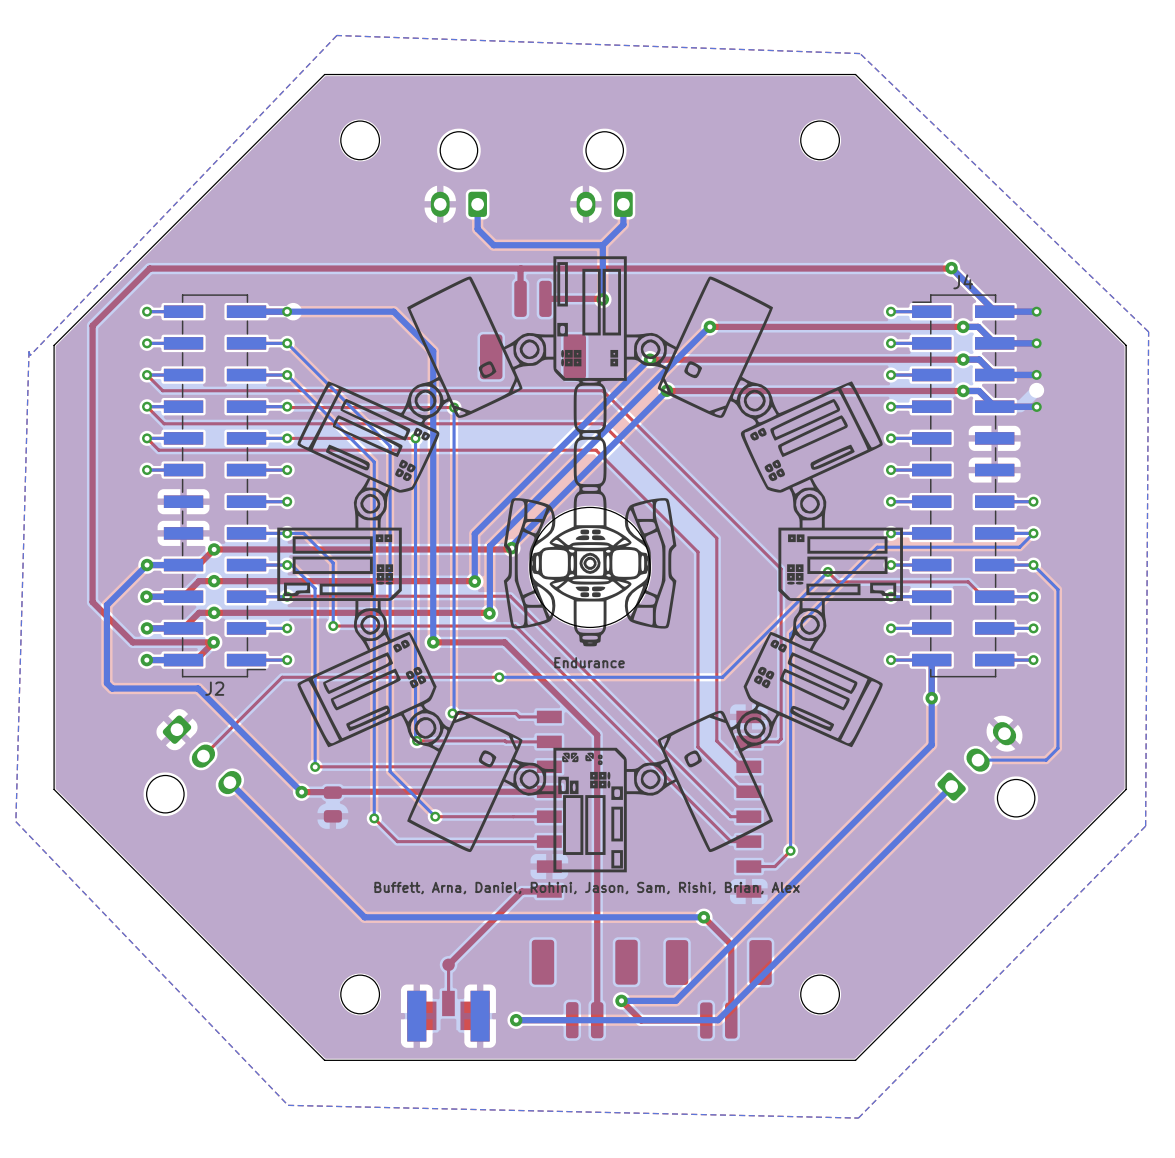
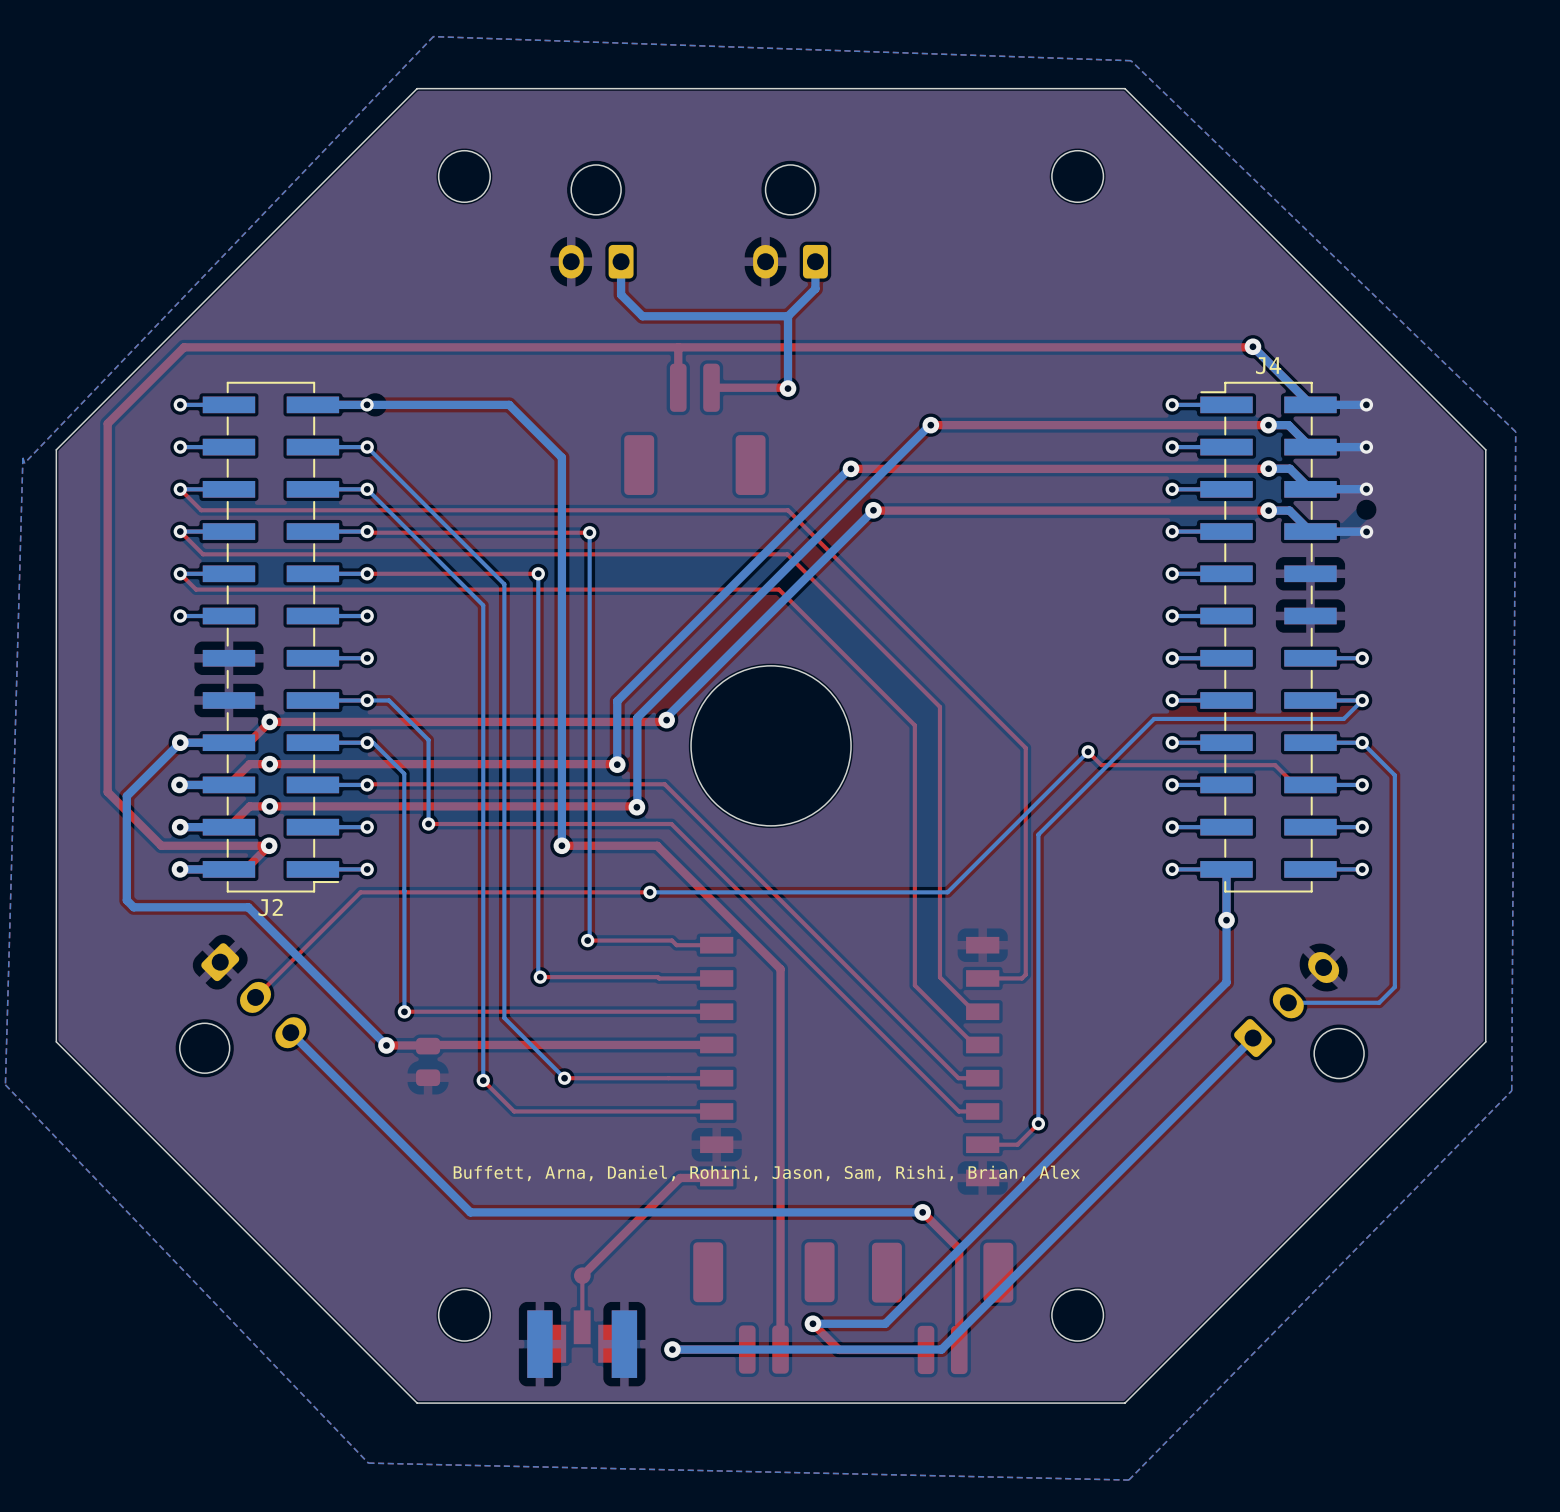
drawing: [277, 256, 903, 873] -> none
text: Endurance (589, 662) -> none

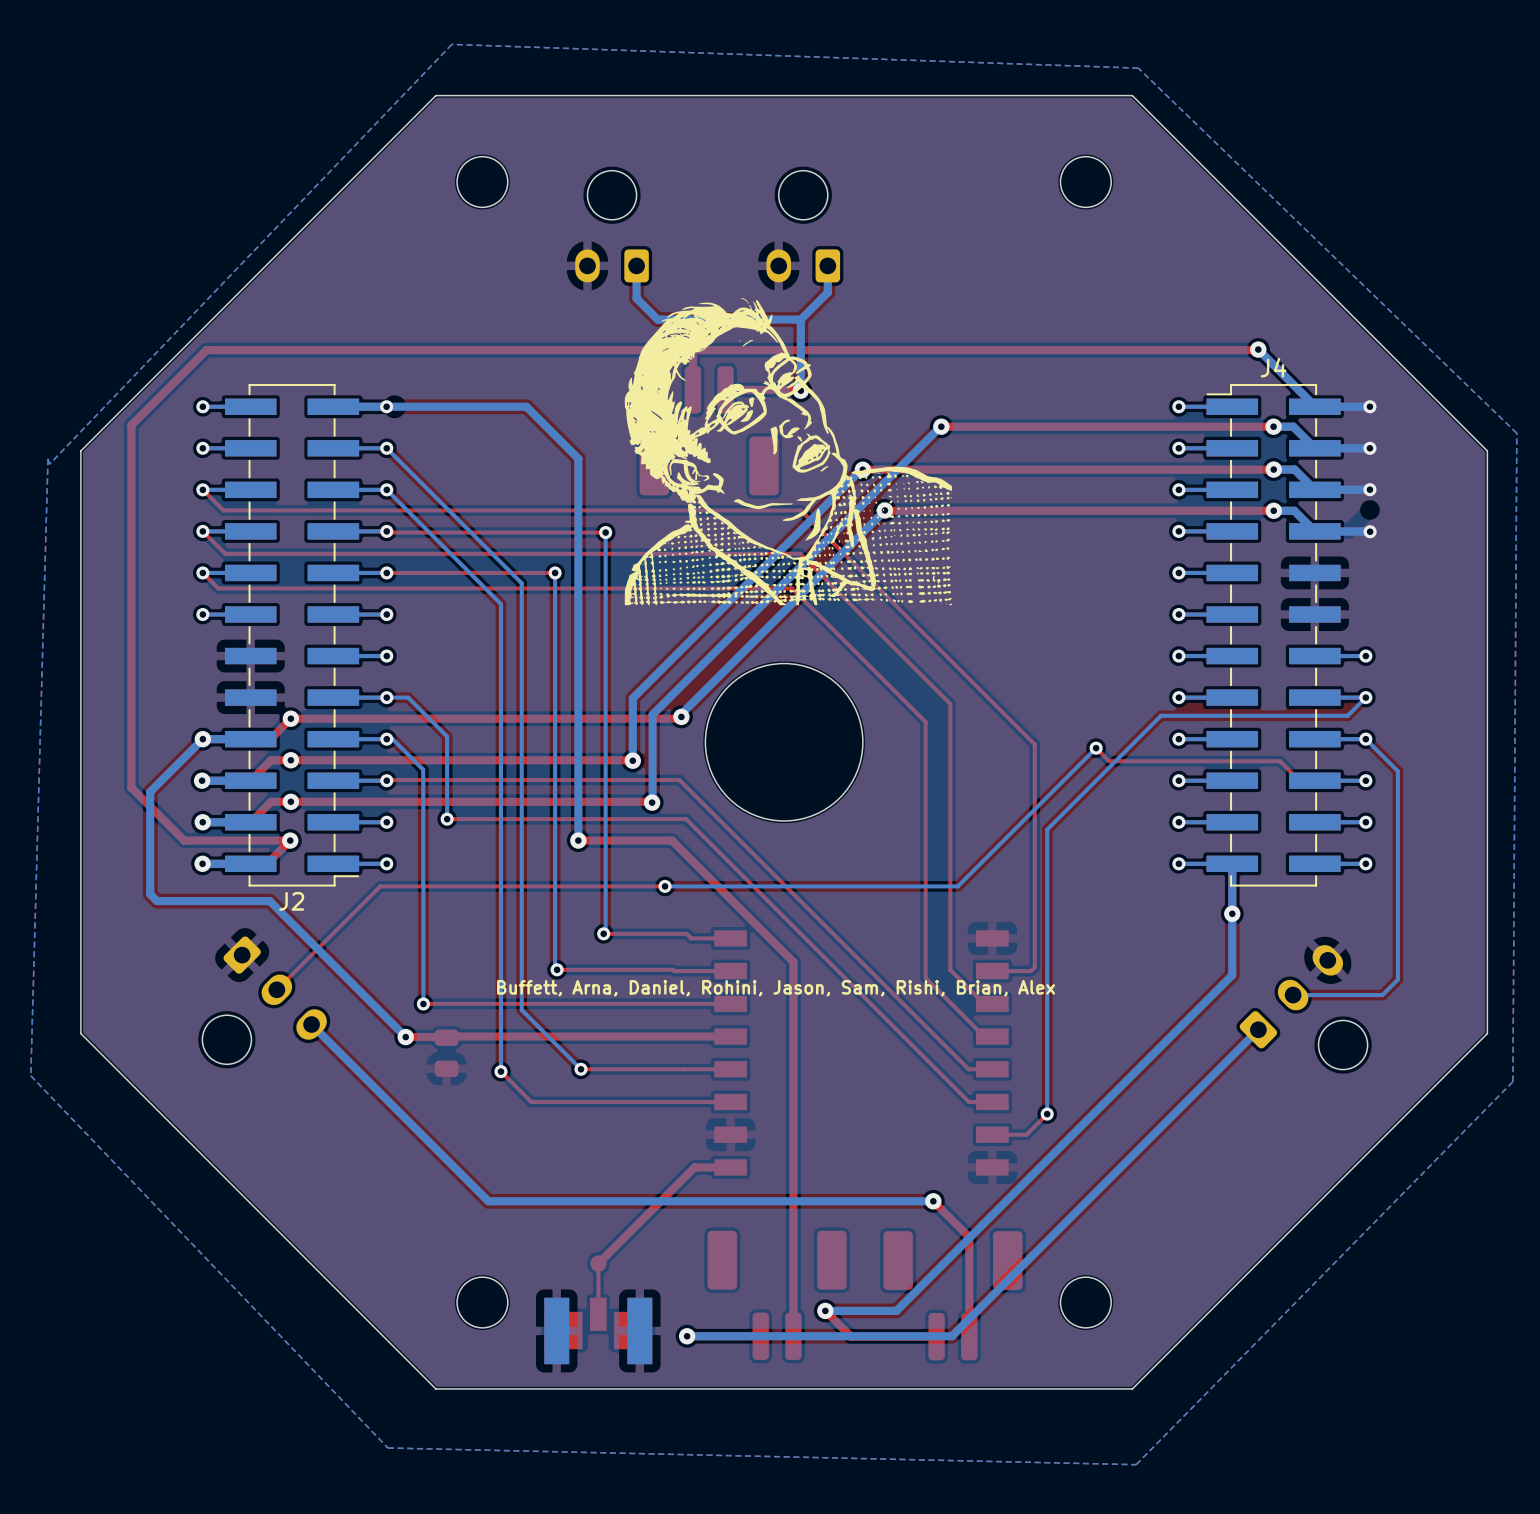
drawing: none -> [624, 298, 952, 606]
text position: Buffett, Arna, Daniel, Rohini, Jason, Sam, Rishi, Brian, Alex (766, 1173) -> Buffett, Arna, Daniel, Rohini, Jason, Sam, Rishi, Brian, Alex (776, 988)

